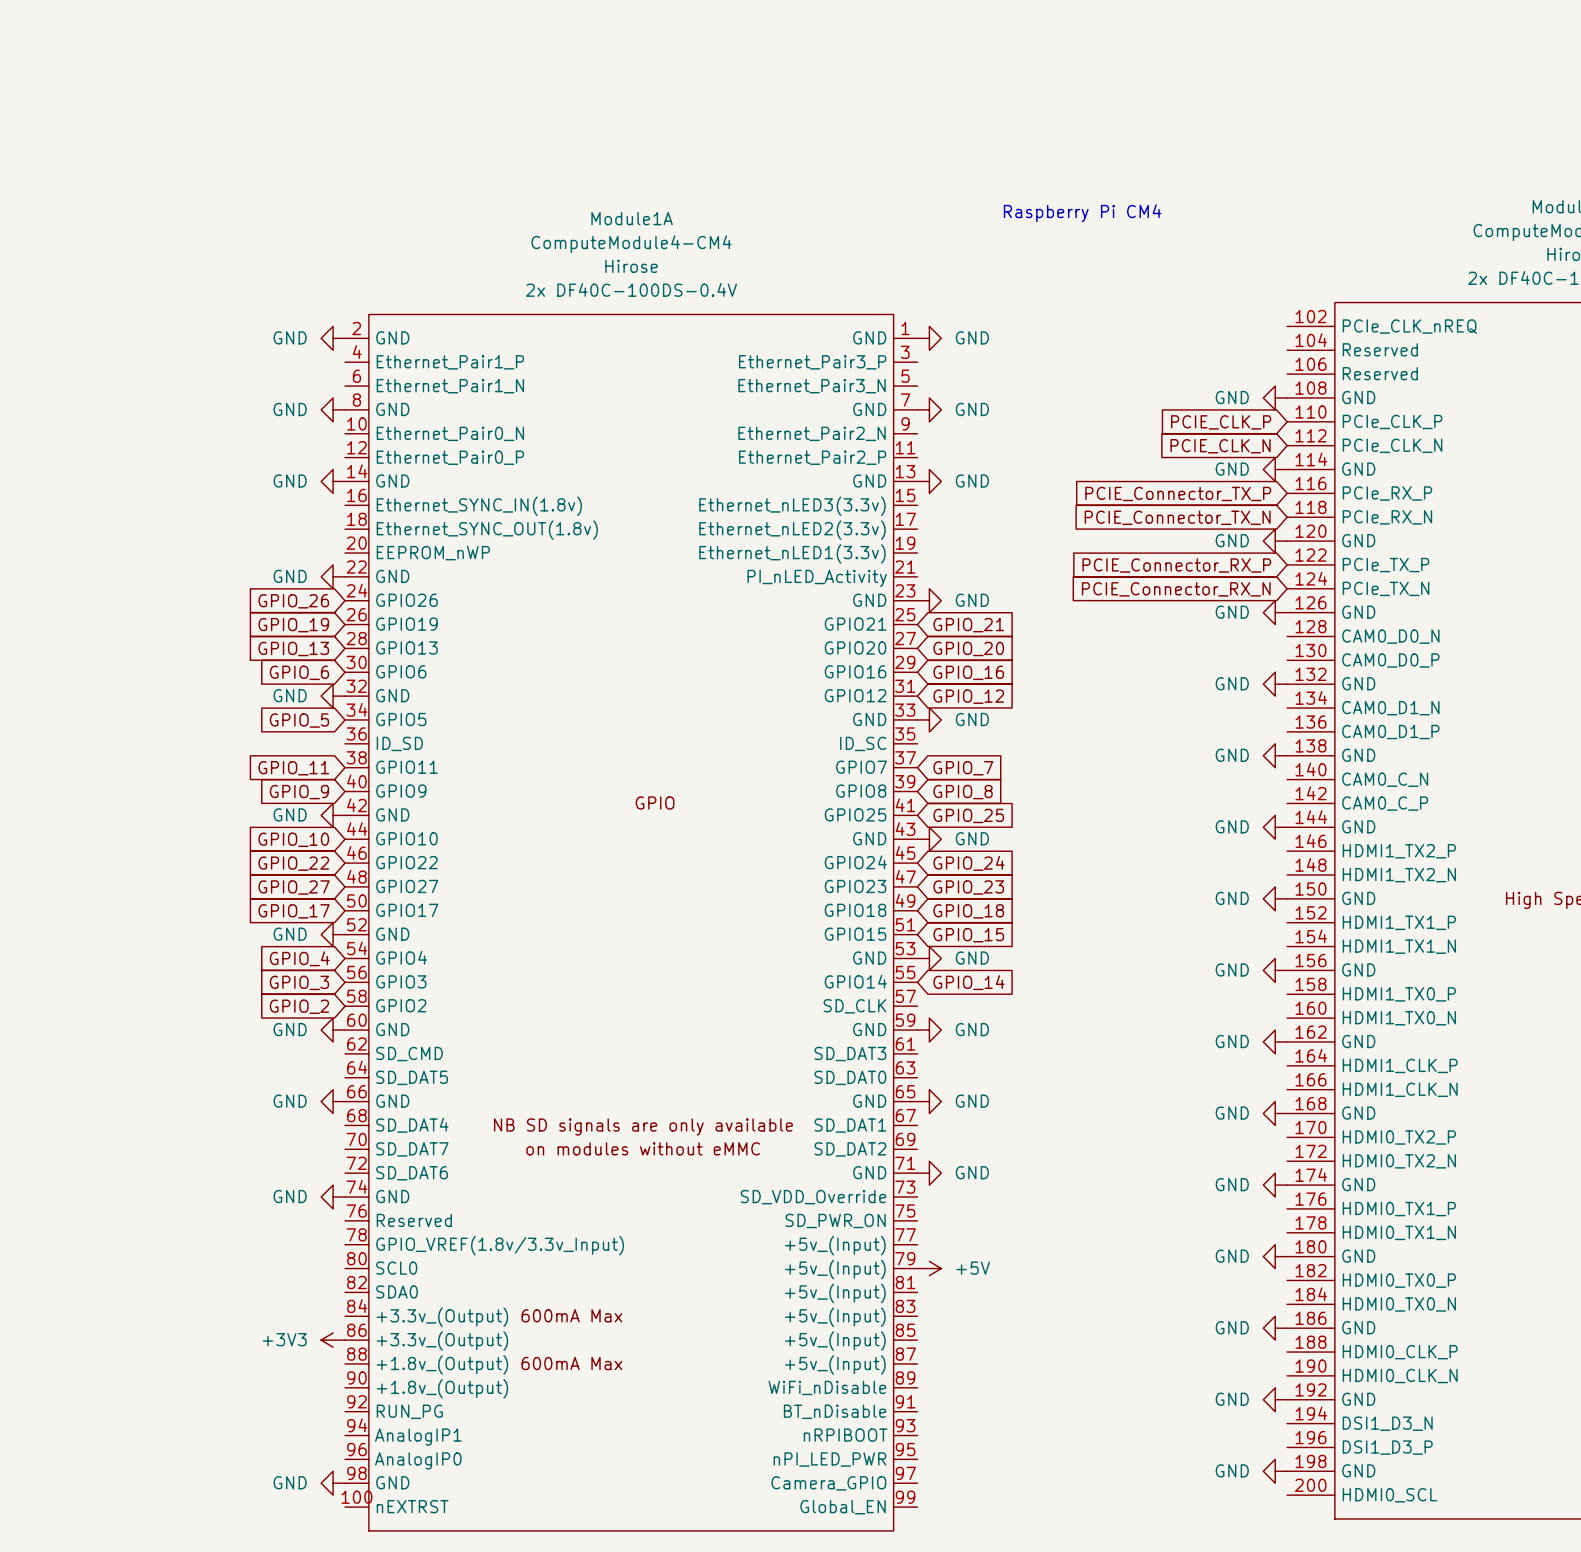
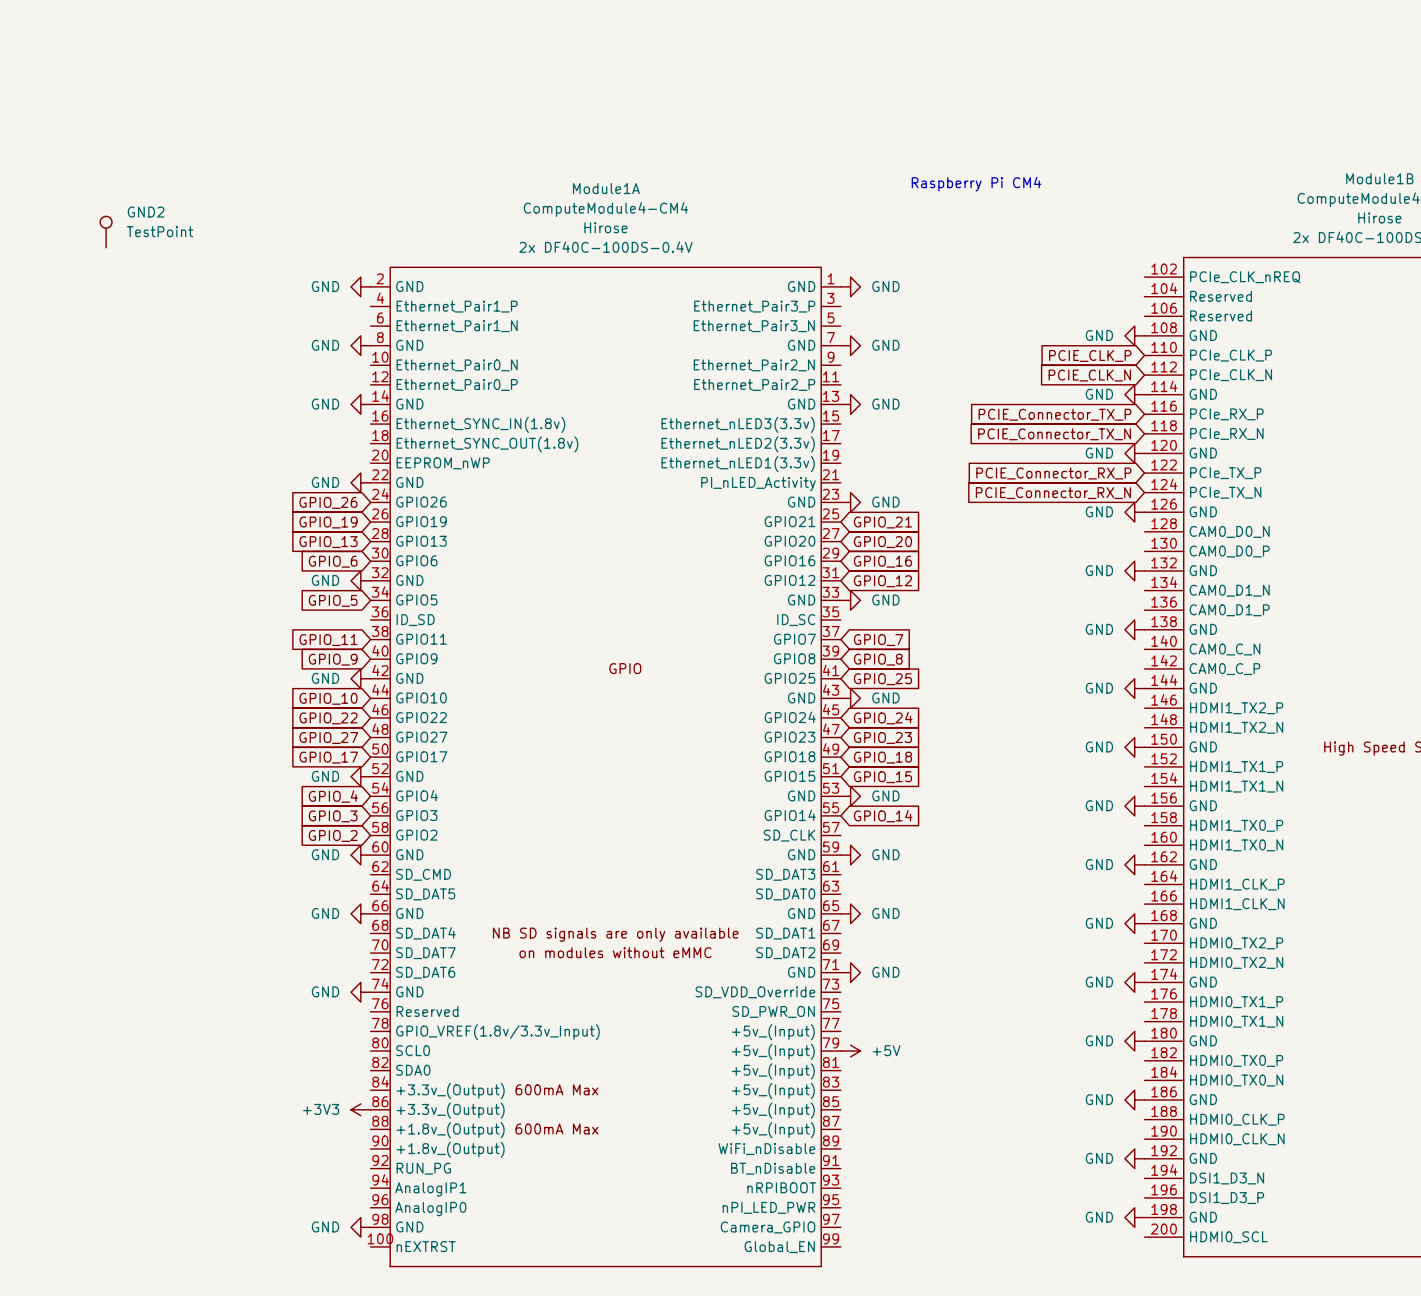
GND2: none -> TestPoint (106, 232)

